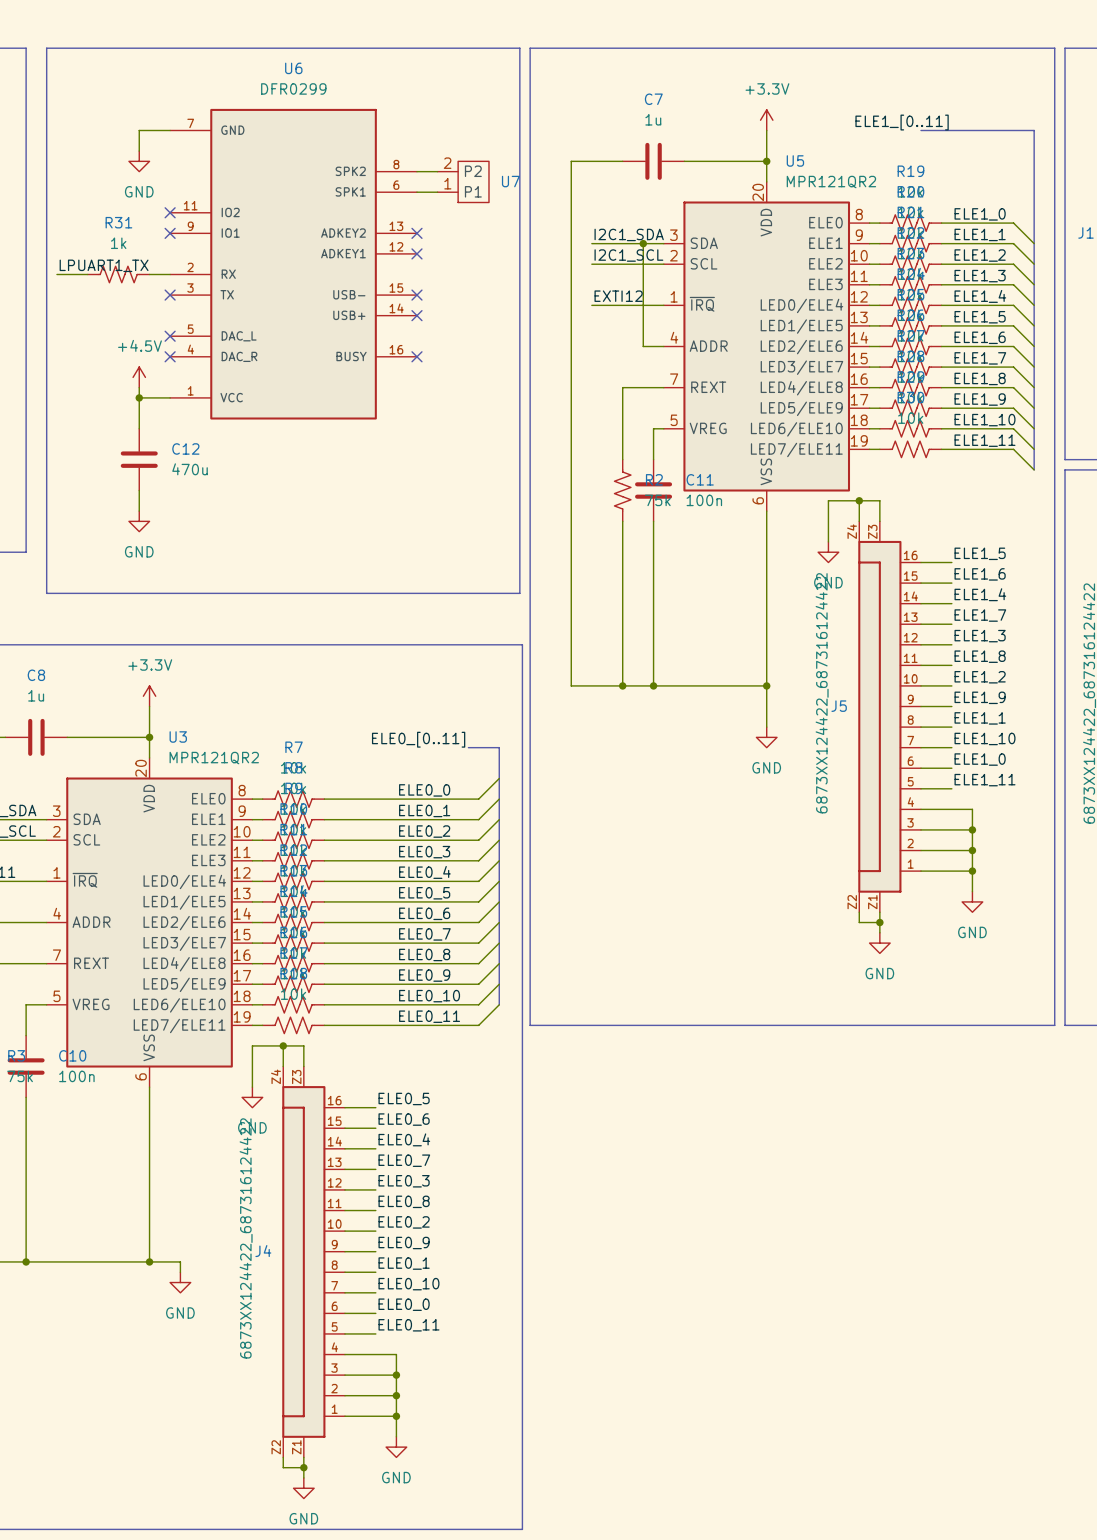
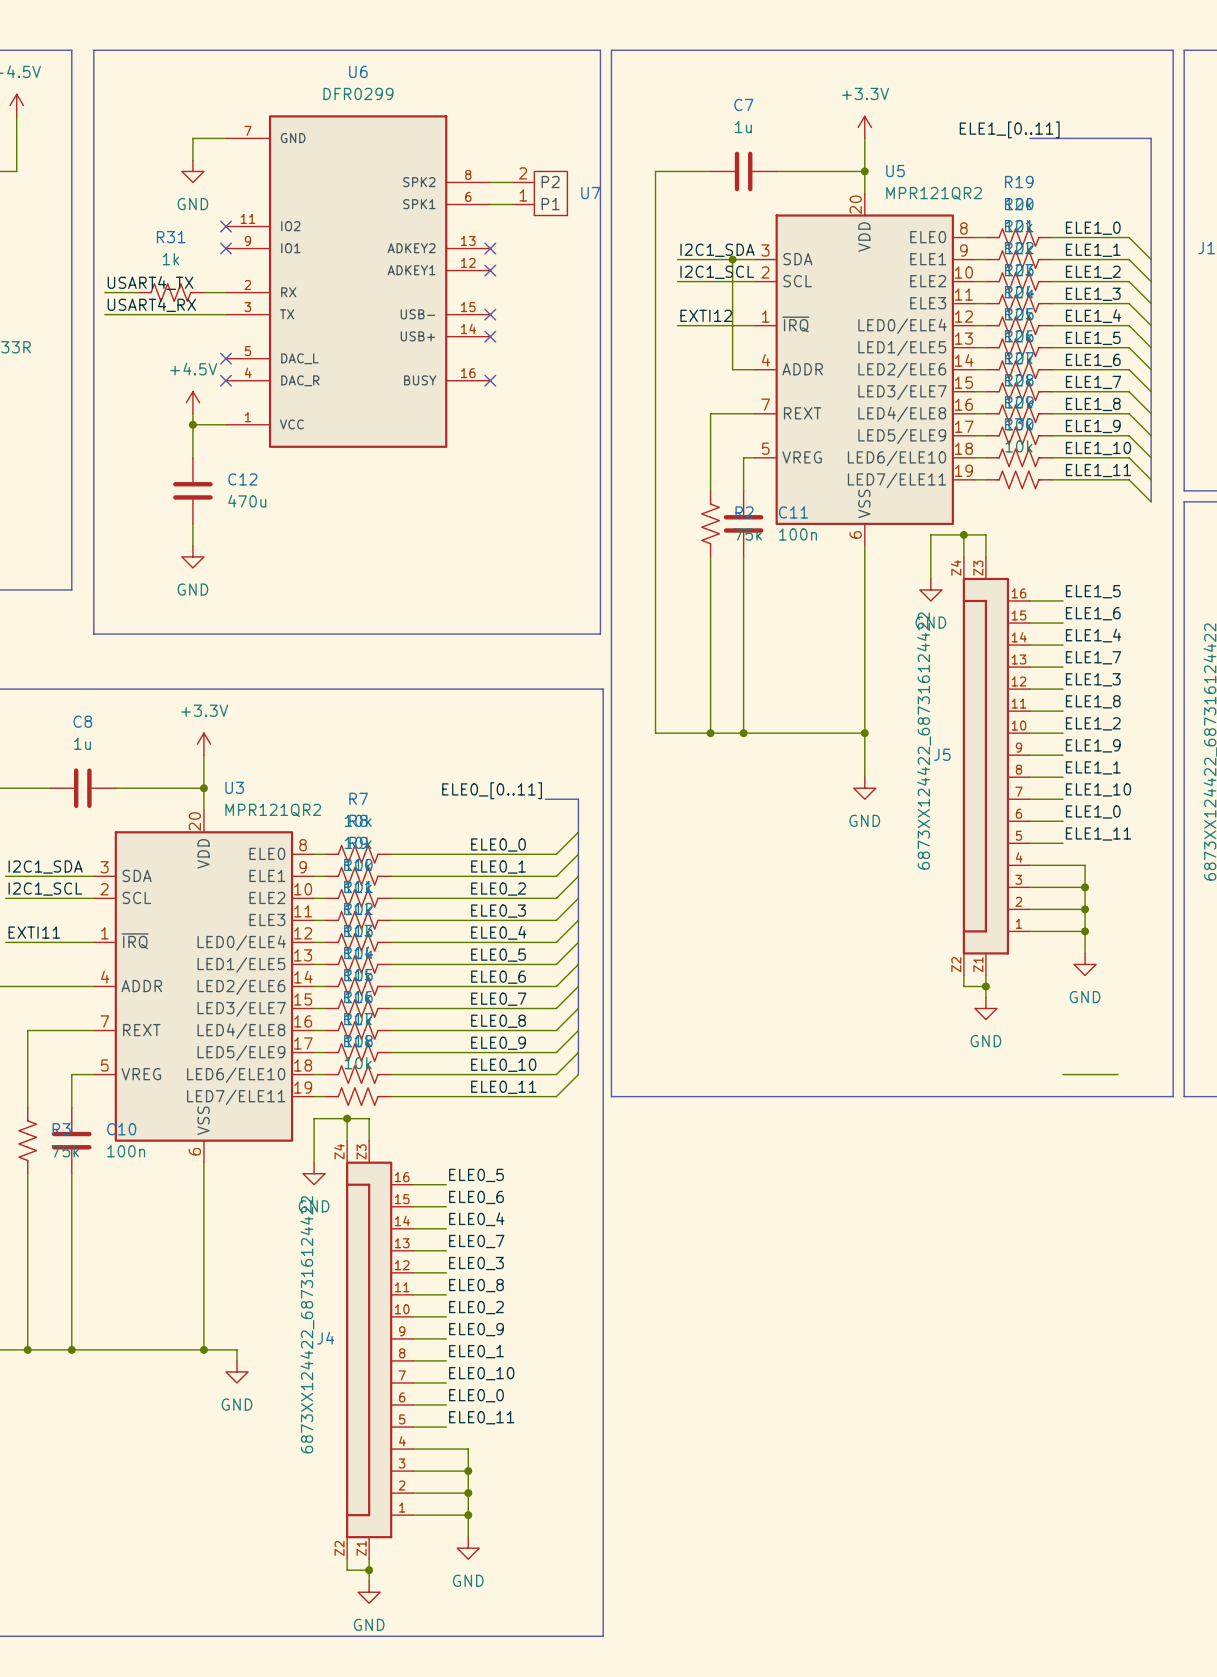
label: LPUART1_TX (104, 265) -> USART4_TX (150, 283)
label: none -> USART4_RX (151, 305)
wire: none -> (104, 314) (225, 314)
no-connect mark: (170, 295) -> none
wire: none -> (1063, 1074) (1118, 1074)

